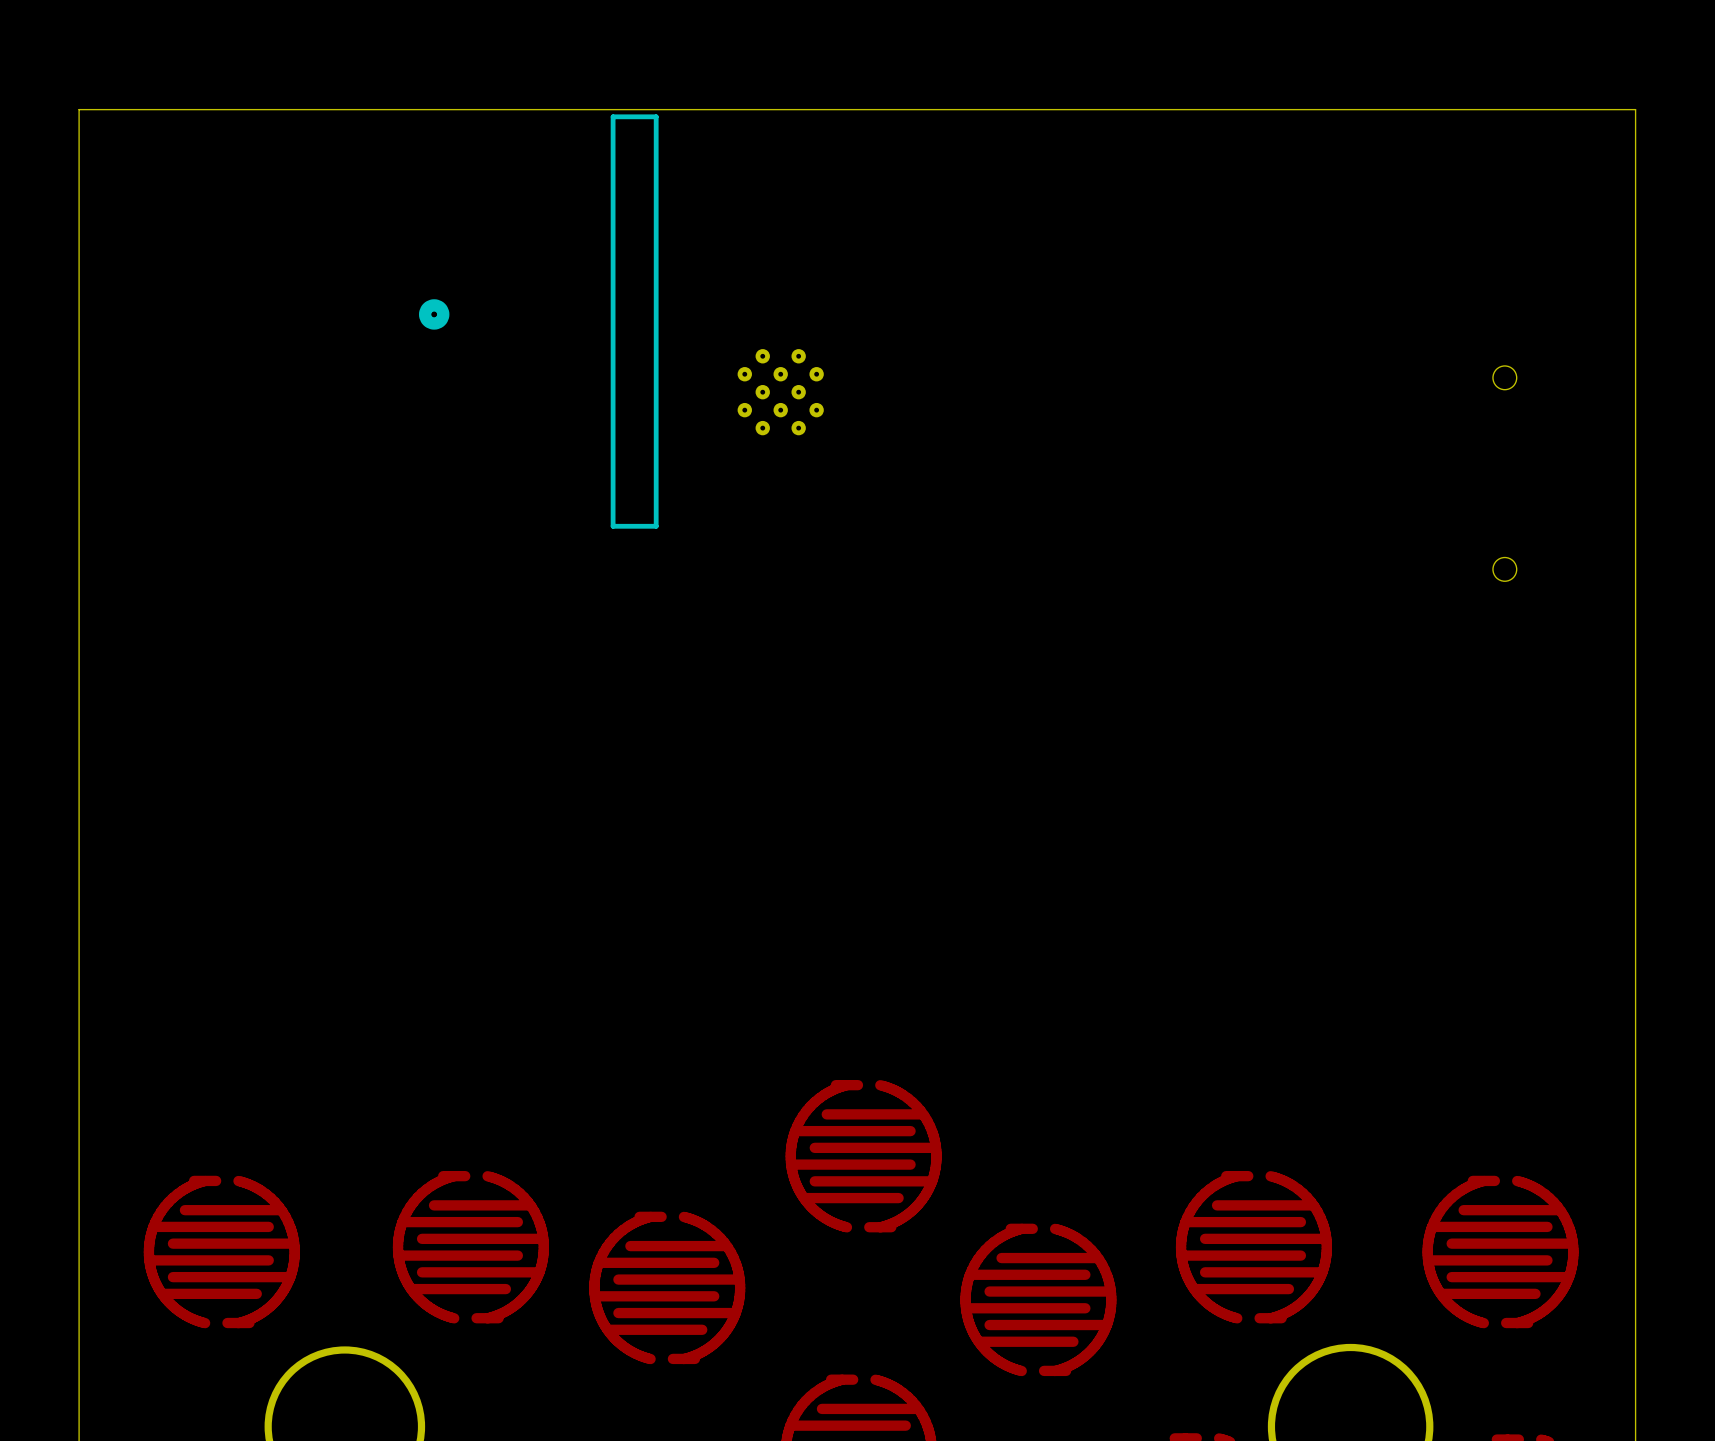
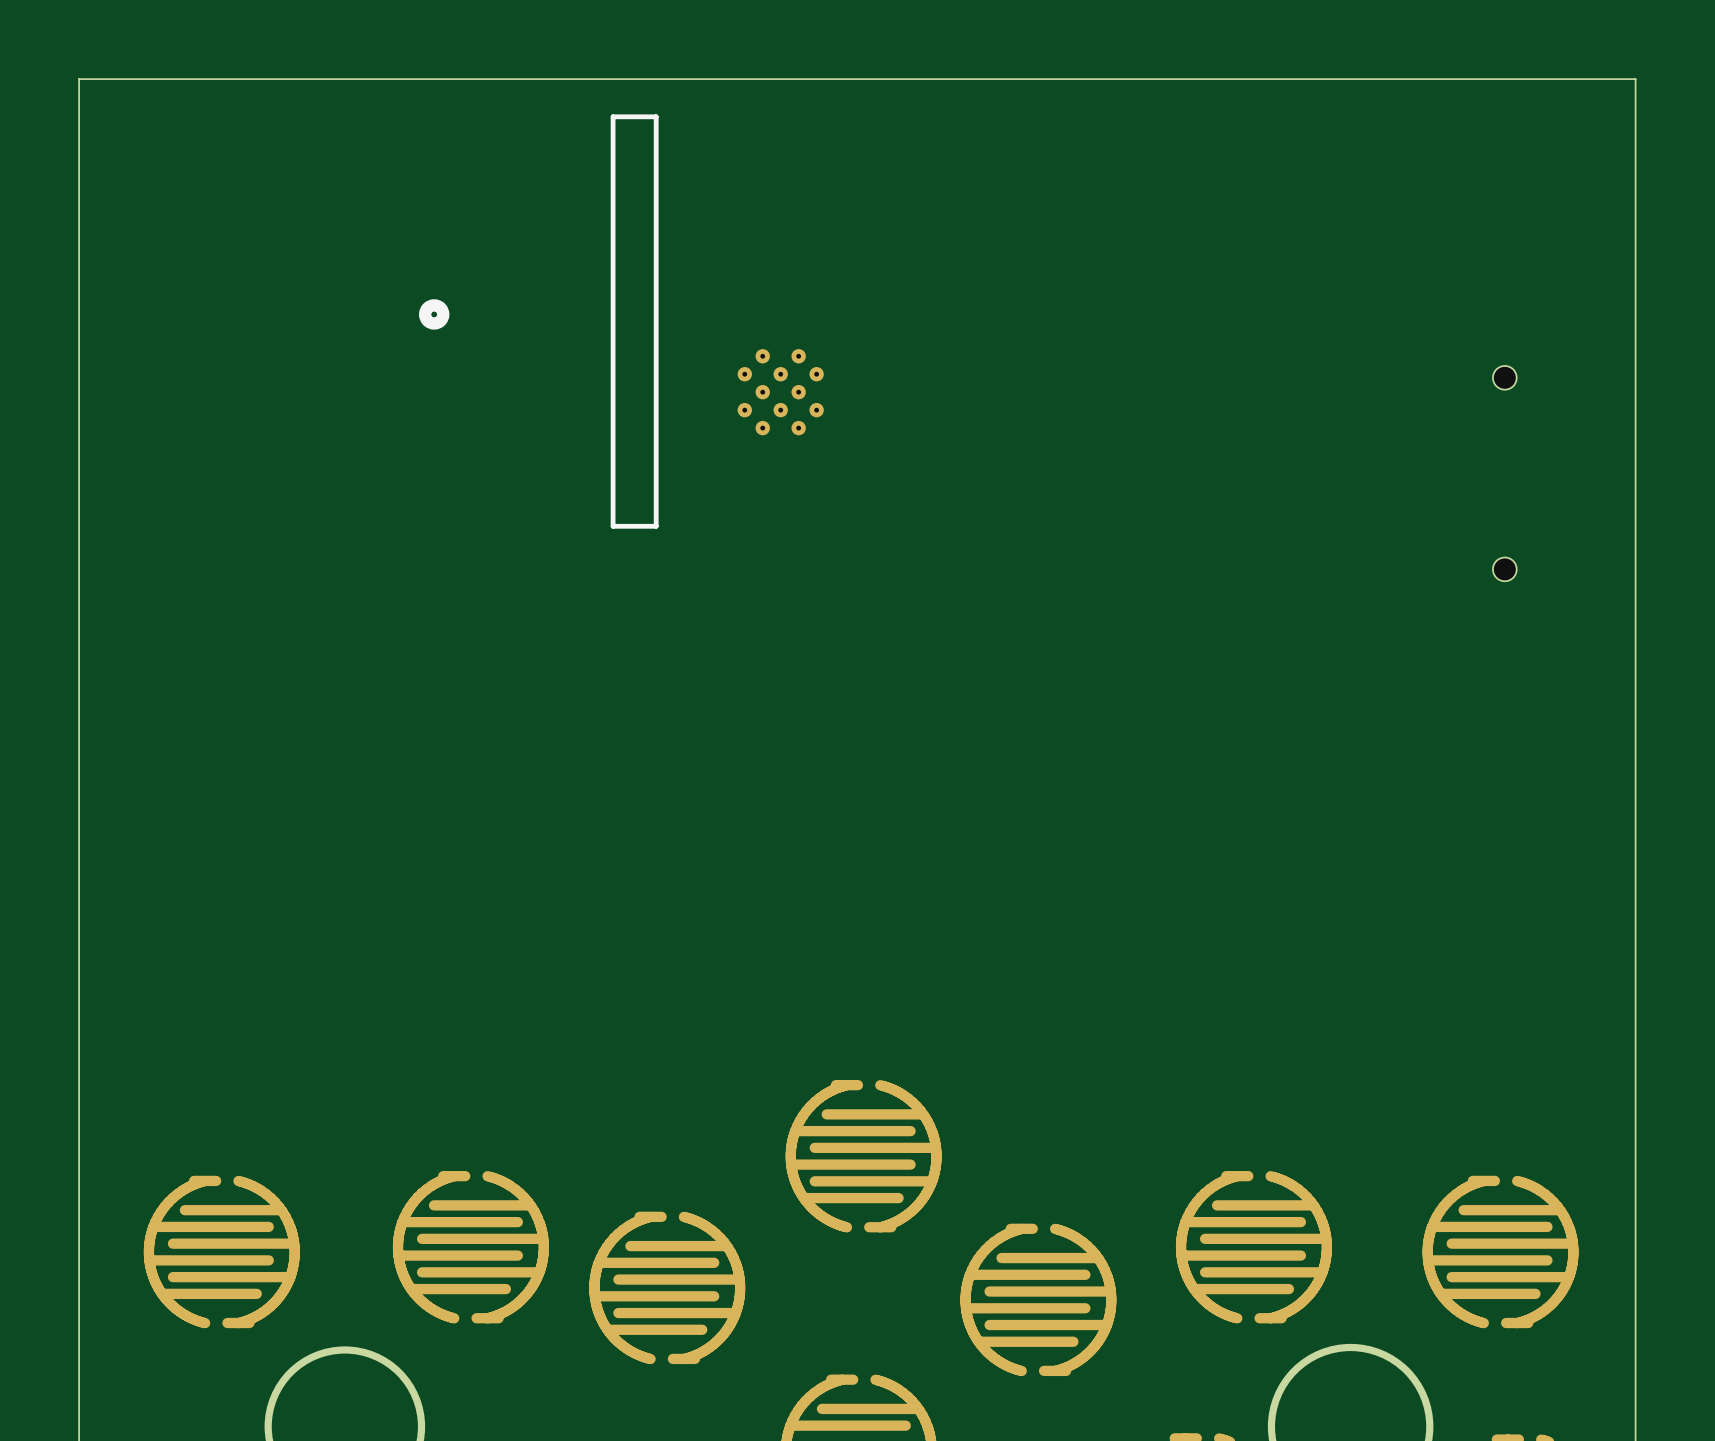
board edge: (79, 109) (1635, 109) -> (79, 109) (79, 79) (1635, 79) (1635, 109)

